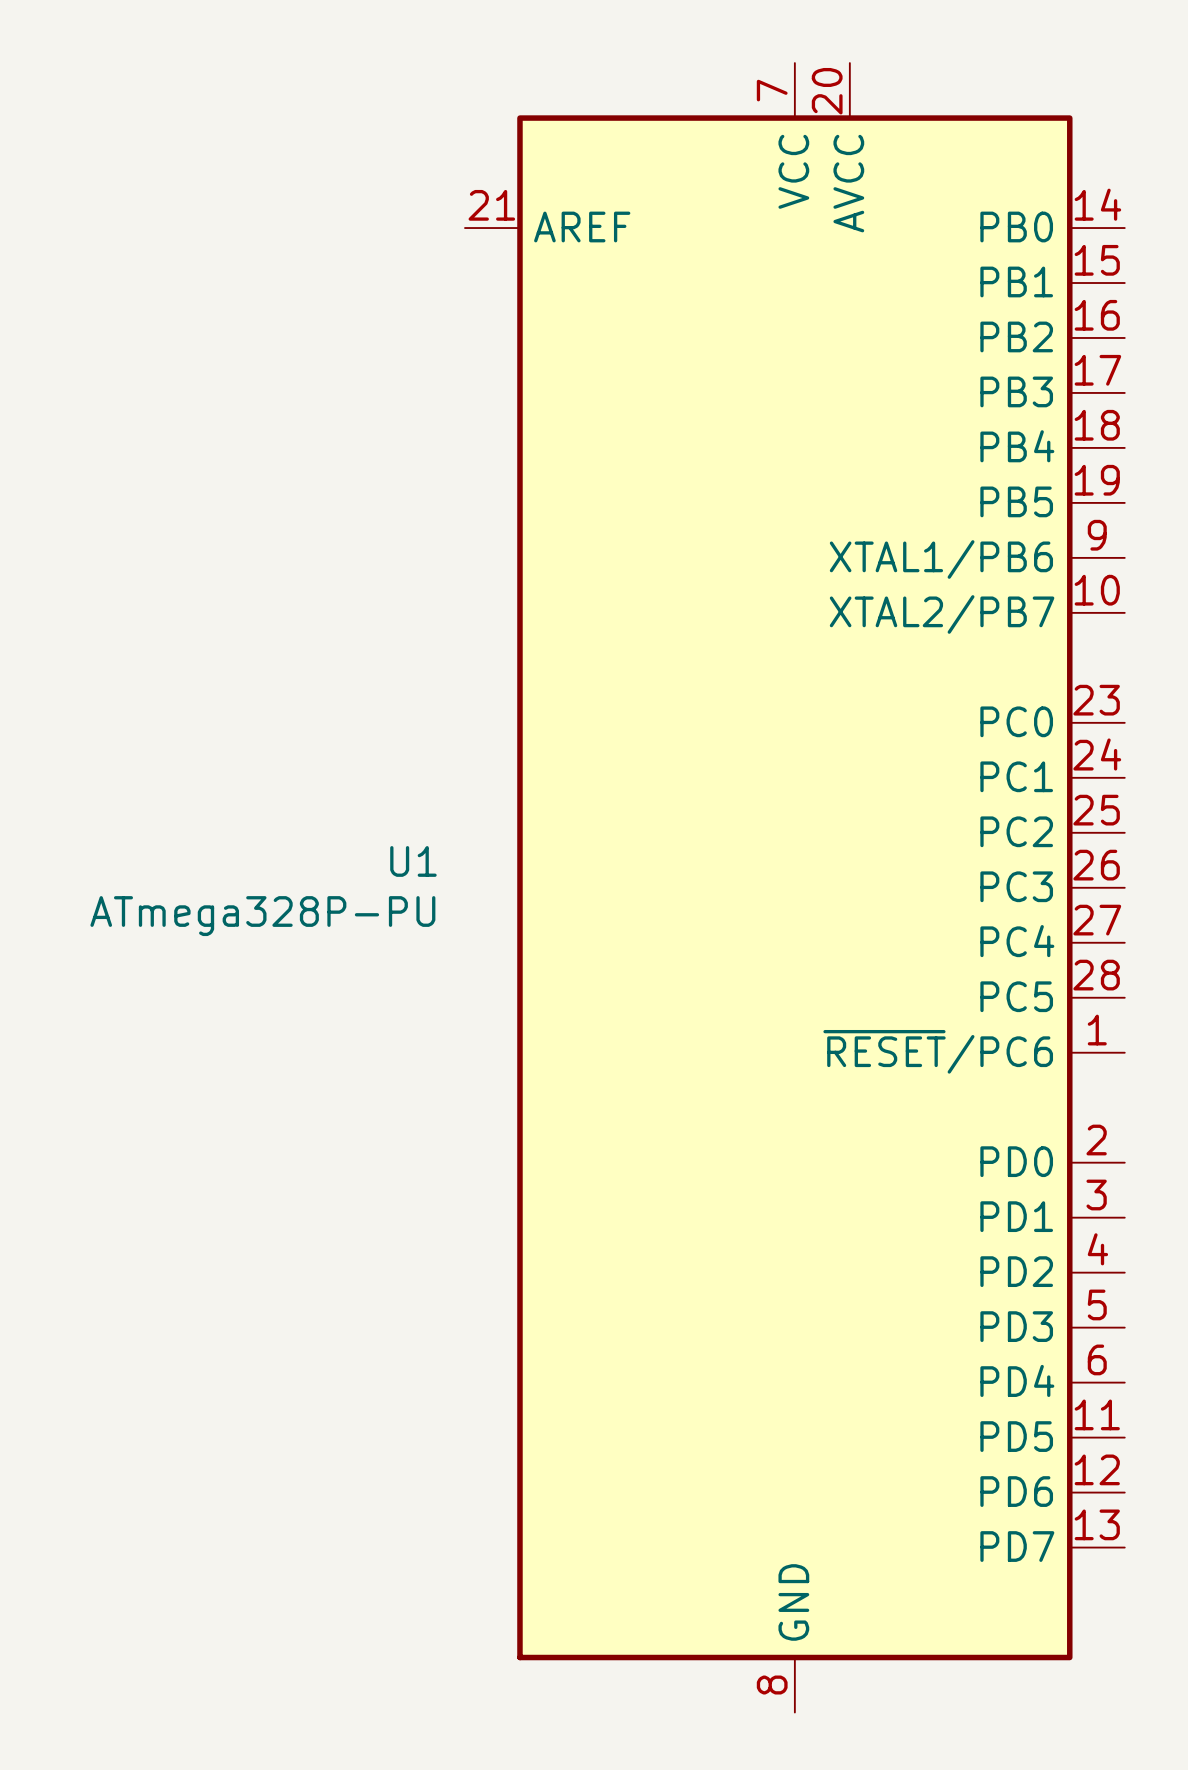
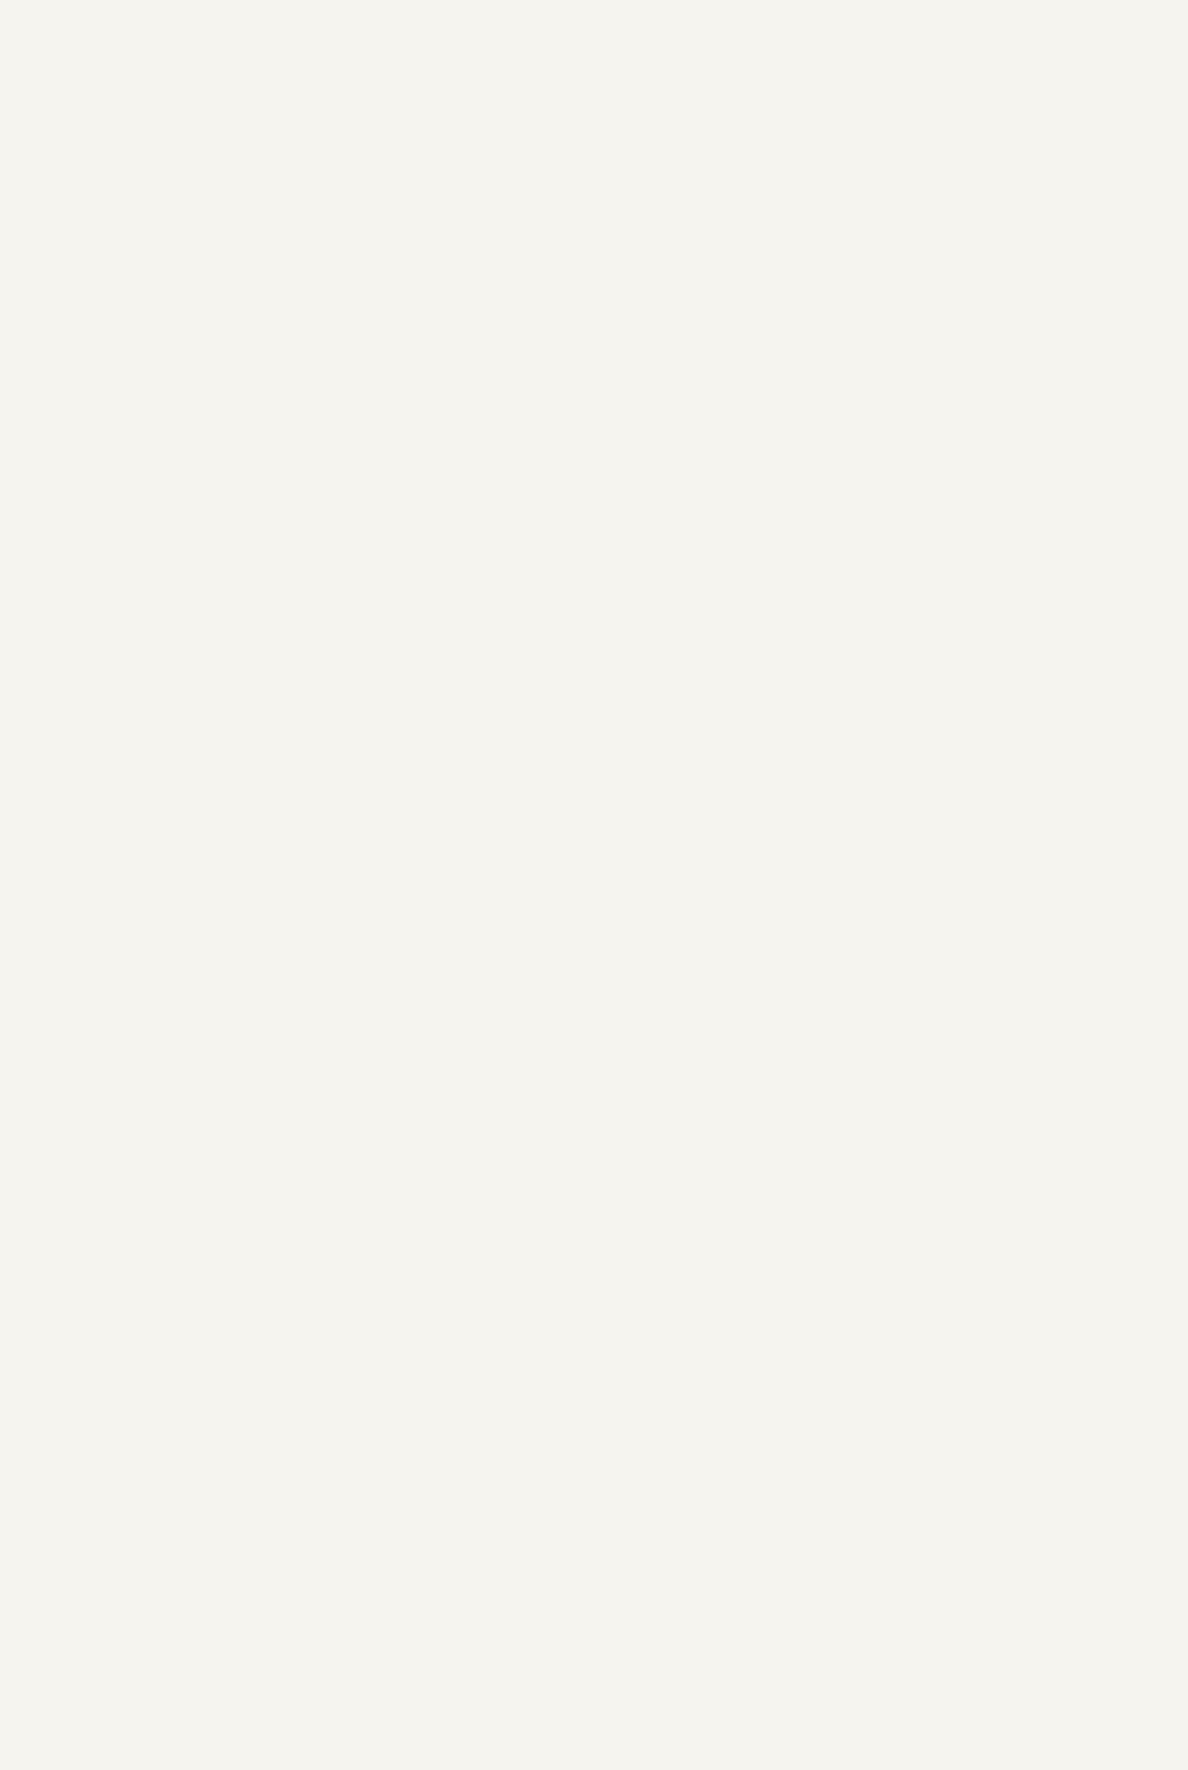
U1: ATmega328P-PU (794, 887) -> none

